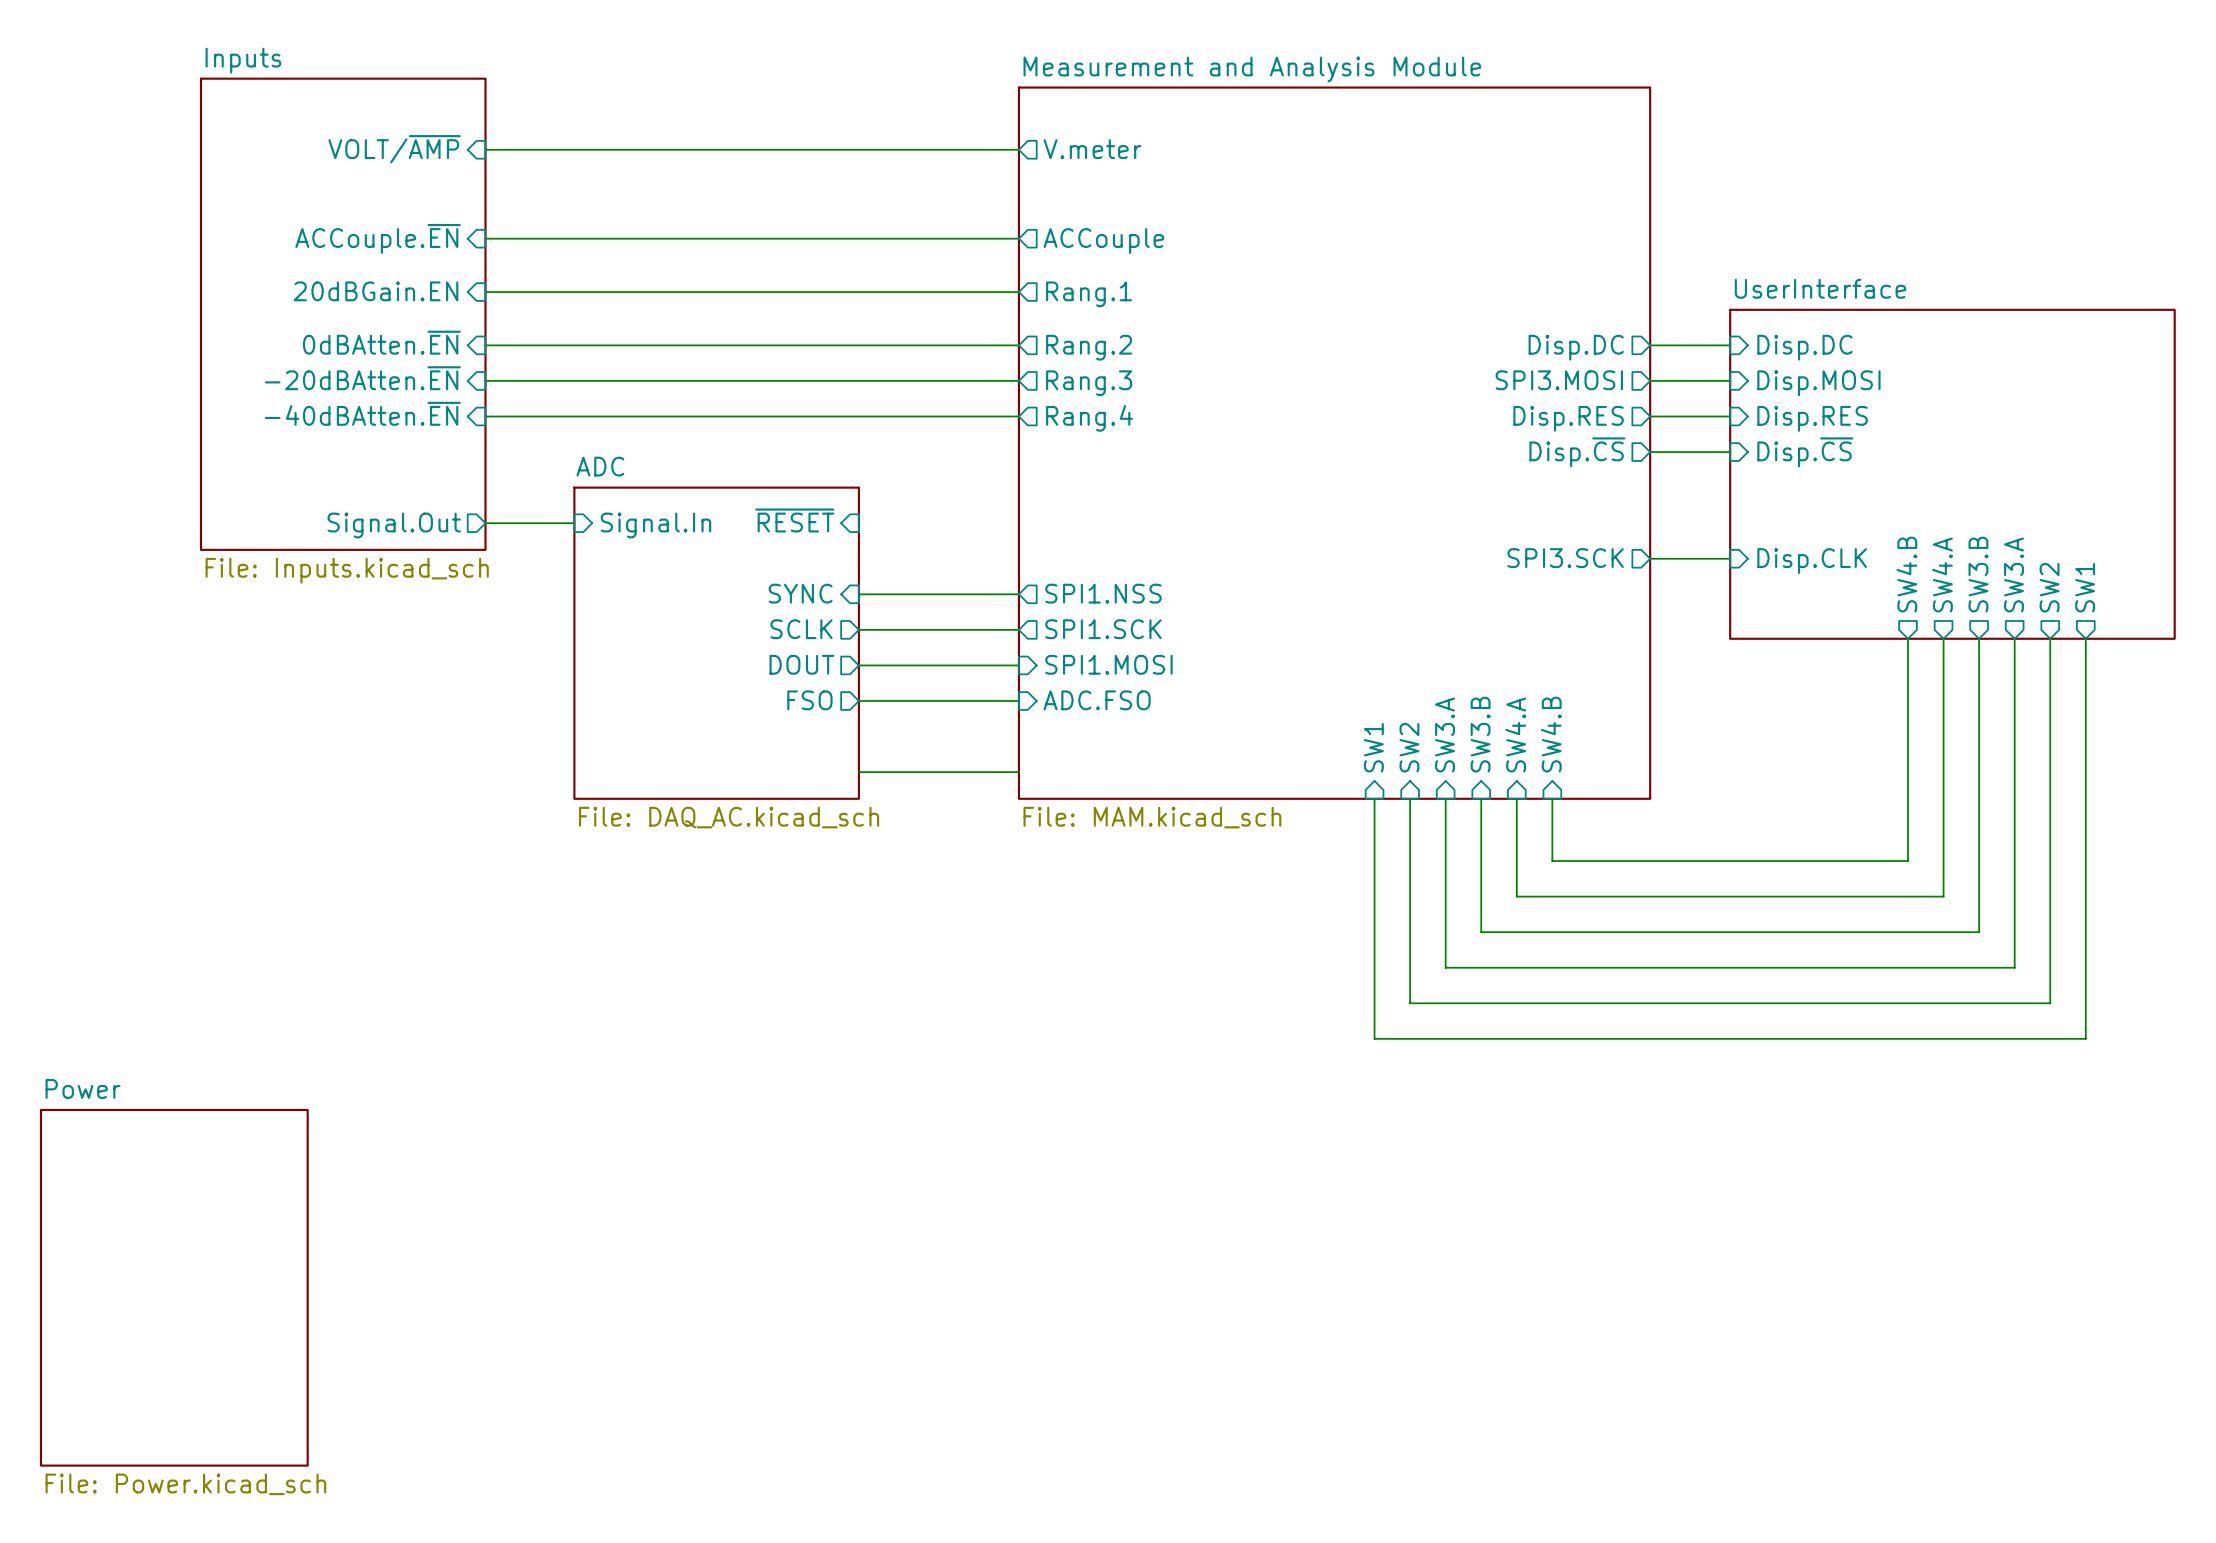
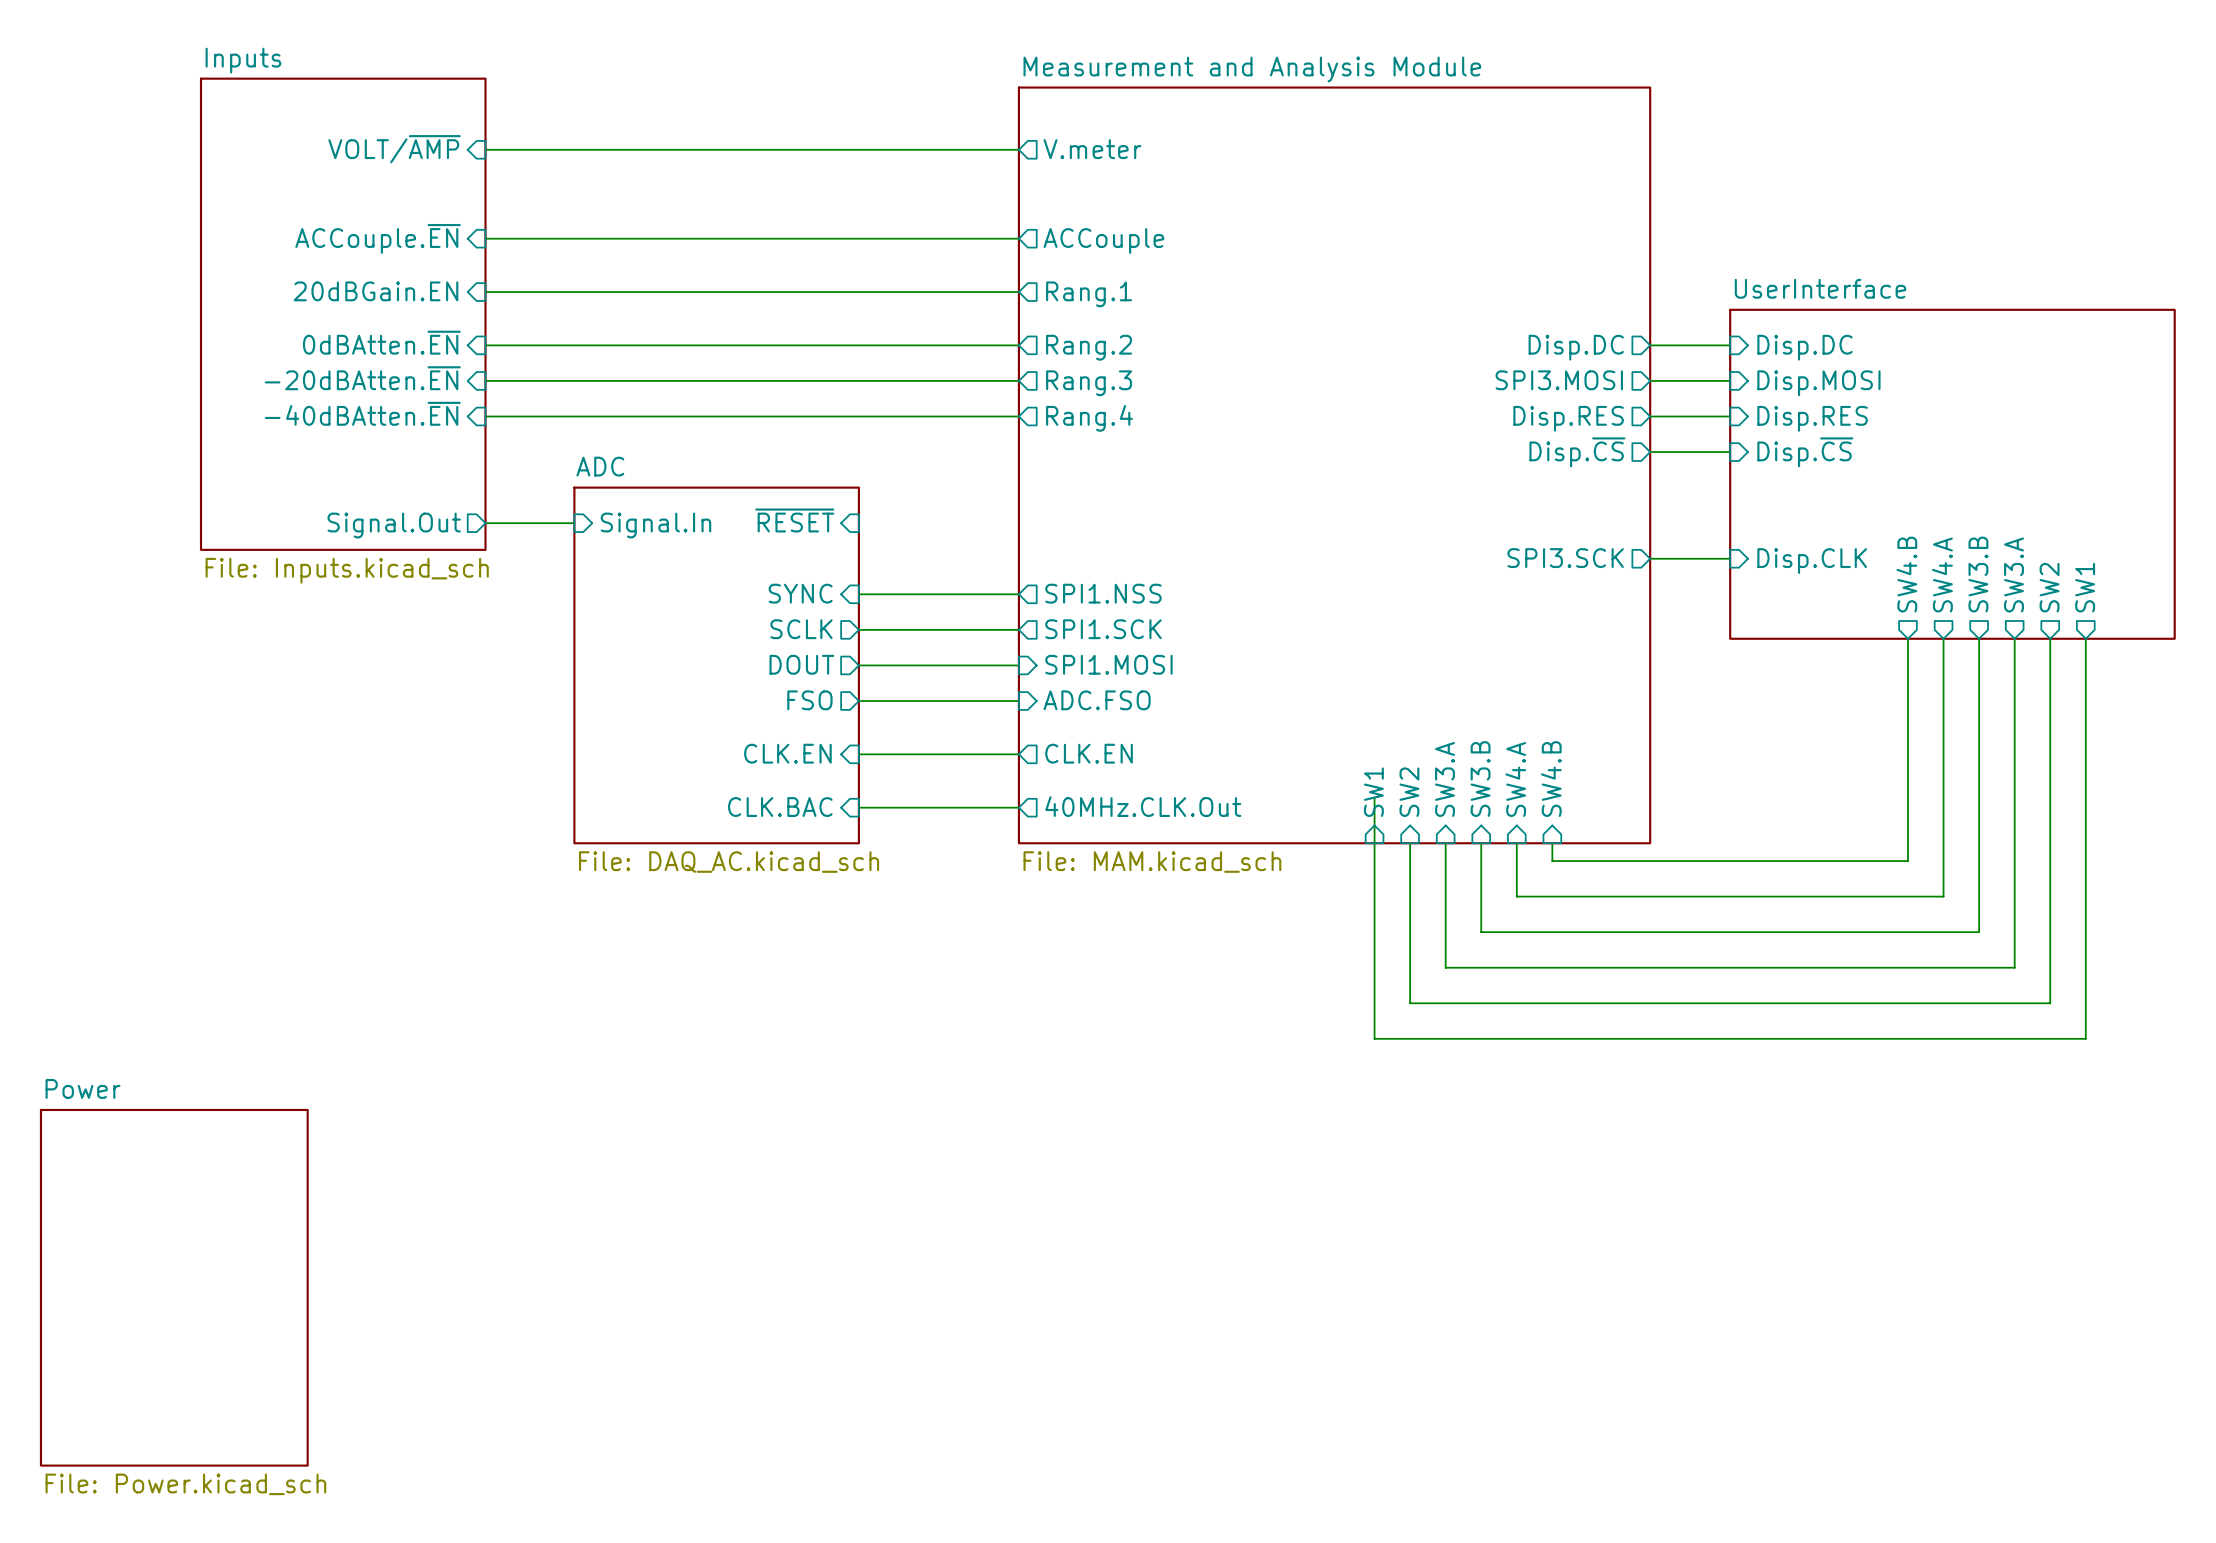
sheet Measurement and Analysis Module: File: MAM.kicad_sch (1334, 443) -> none
sheet Measurement and Analysis Module: none -> File: MAM.kicad_sch (1334, 465)
sheet ADC: File: DAQ_AC.kicad_sch (716, 643) -> none
sheet ADC: none -> File: DAQ_AC.kicad_sch (716, 665)
sheet pin position: SW3.B (1480, 734) -> SW3.B (1480, 779)
sheet pin position: SW4.B (1551, 734) -> SW4.B (1551, 779)
sheet pin position: SW3.A (1445, 735) -> SW3.A (1445, 779)
sheet pin position: SW4.A (1515, 735) -> SW4.A (1515, 779)
sheet pin position: SW1 (1373, 747) -> SW1 (1373, 792)
sheet pin position: SW2 (1409, 747) -> SW2 (1409, 792)
sheet pin: none -> CLK.EN (787, 753)
sheet pin: none -> CLK.EN (1089, 753)
wire: (858, 772) (1018, 772) -> (858, 754) (1018, 754)
wire: (1410, 798) (1410, 843) -> none
wire: (1445, 798) (1445, 843) -> none
wire: (1481, 798) (1481, 843) -> none
wire: (1516, 798) (1516, 843) -> none
wire: (1552, 798) (1552, 843) -> none
sheet pin: none -> 40MHz.CLK.Out (1143, 806)
sheet pin: none -> CLK.BAC (780, 807)
wire: none -> (858, 807) (1018, 807)

